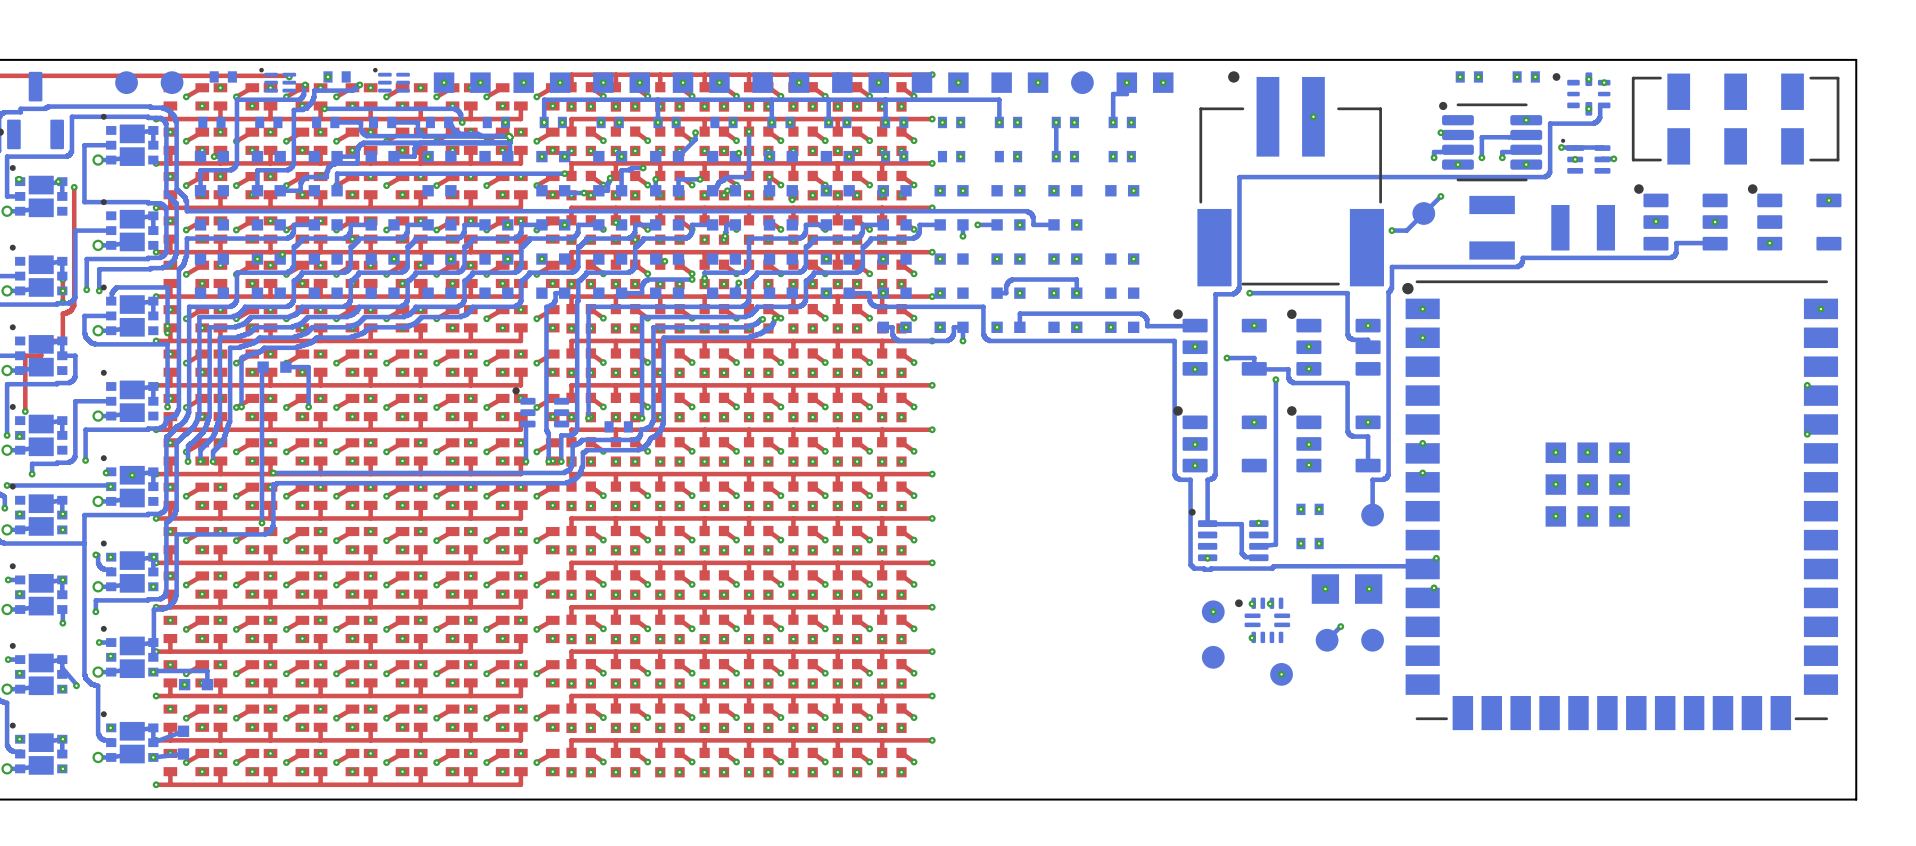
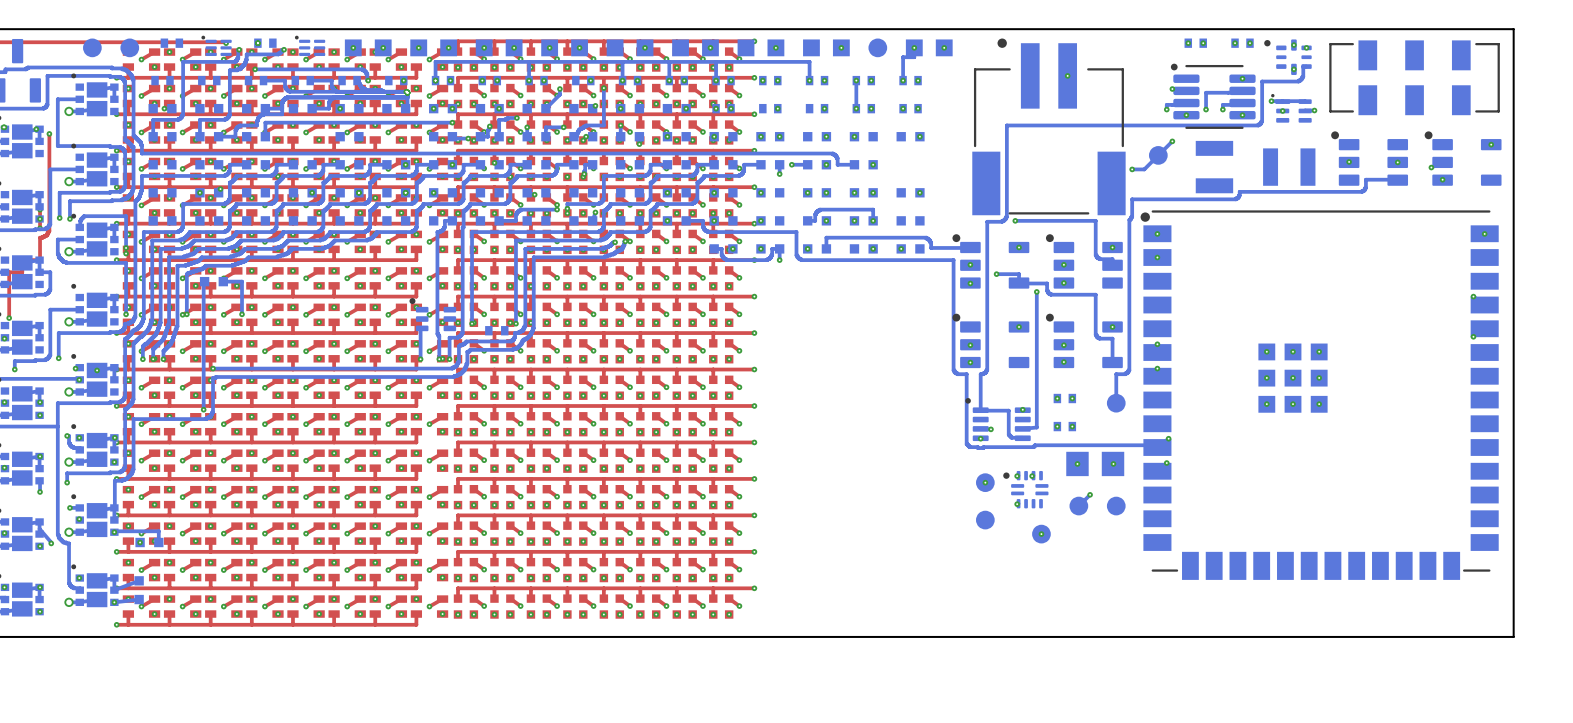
via: none -> (1431, 167)
via: none -> (990, 429)

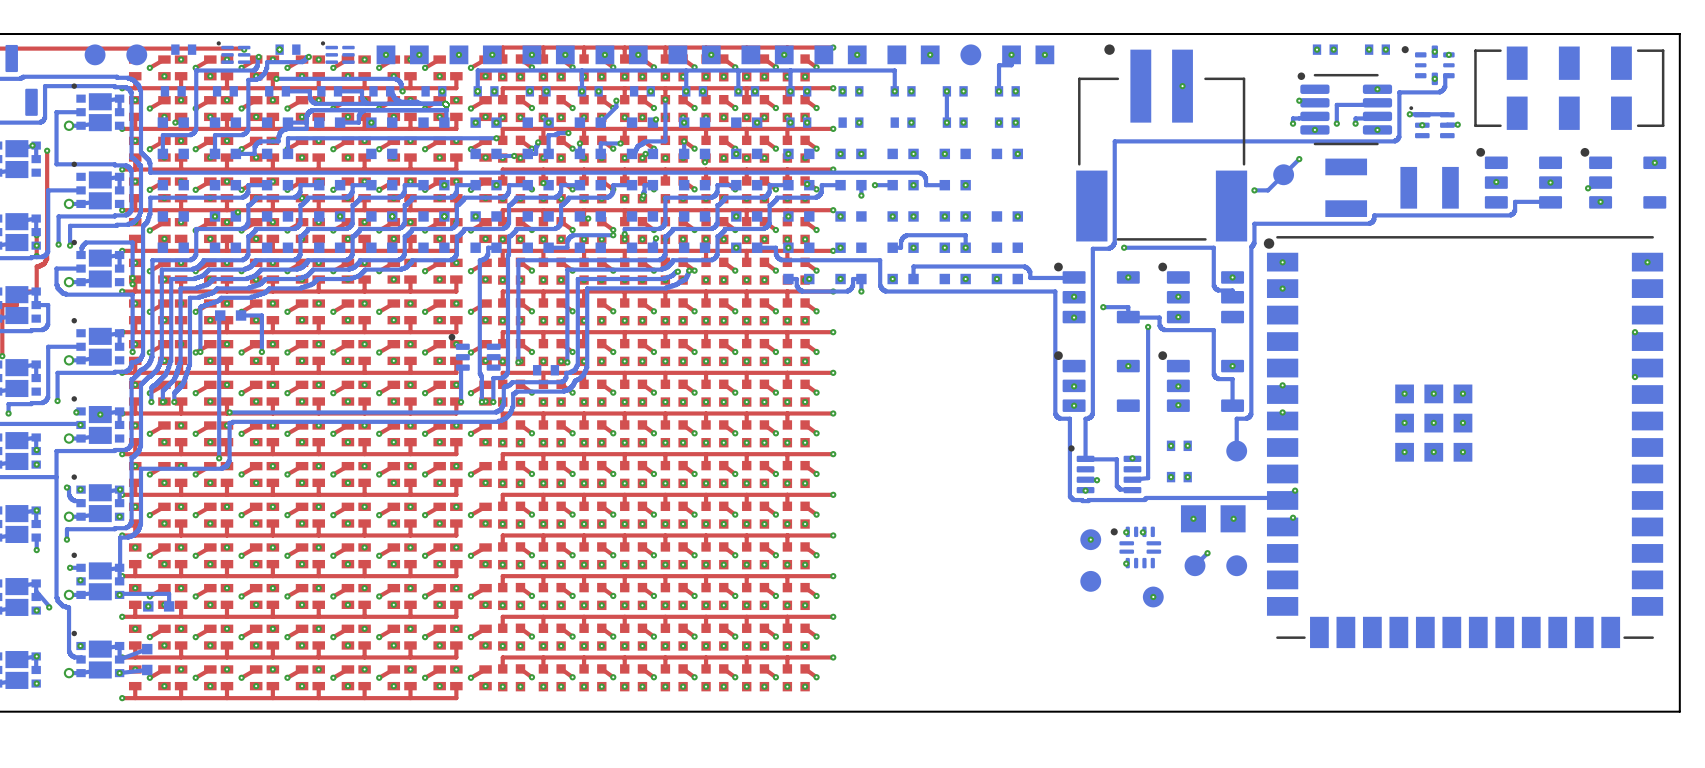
via: none -> (807, 184)

